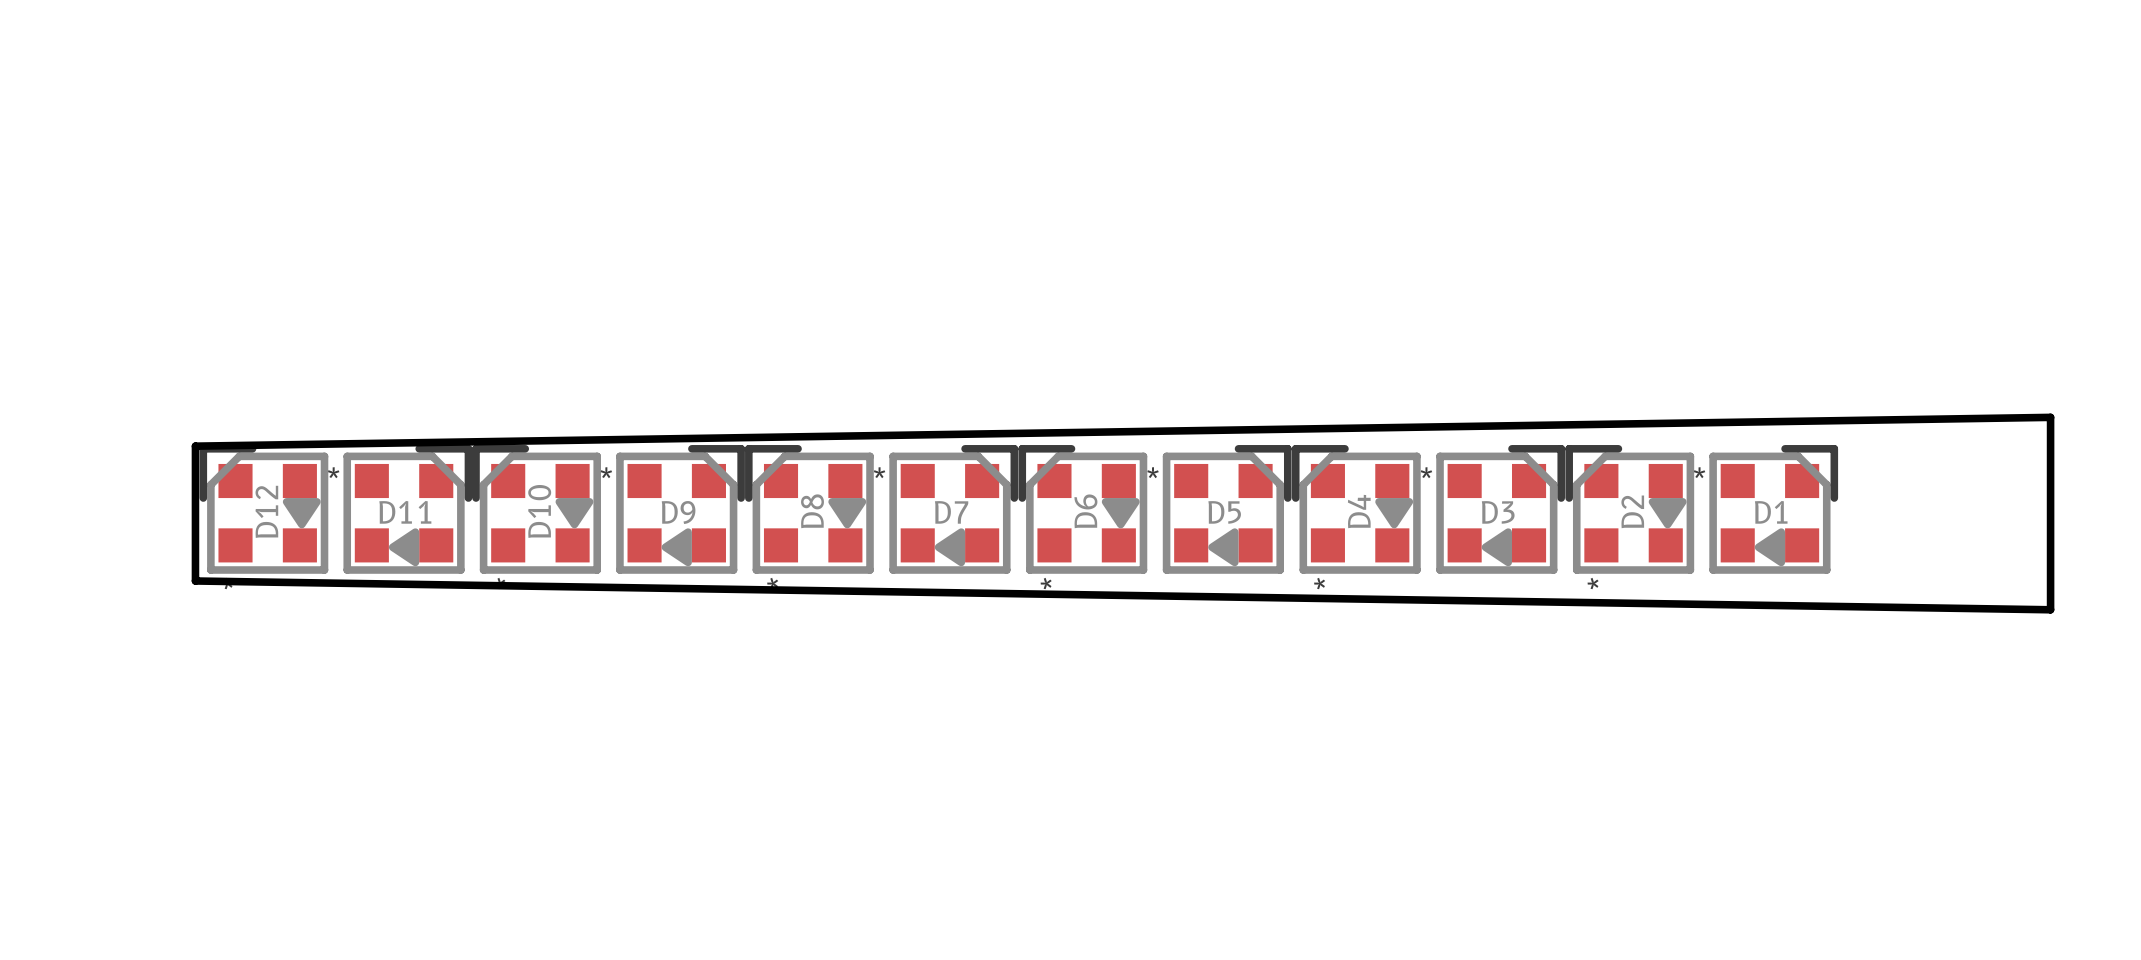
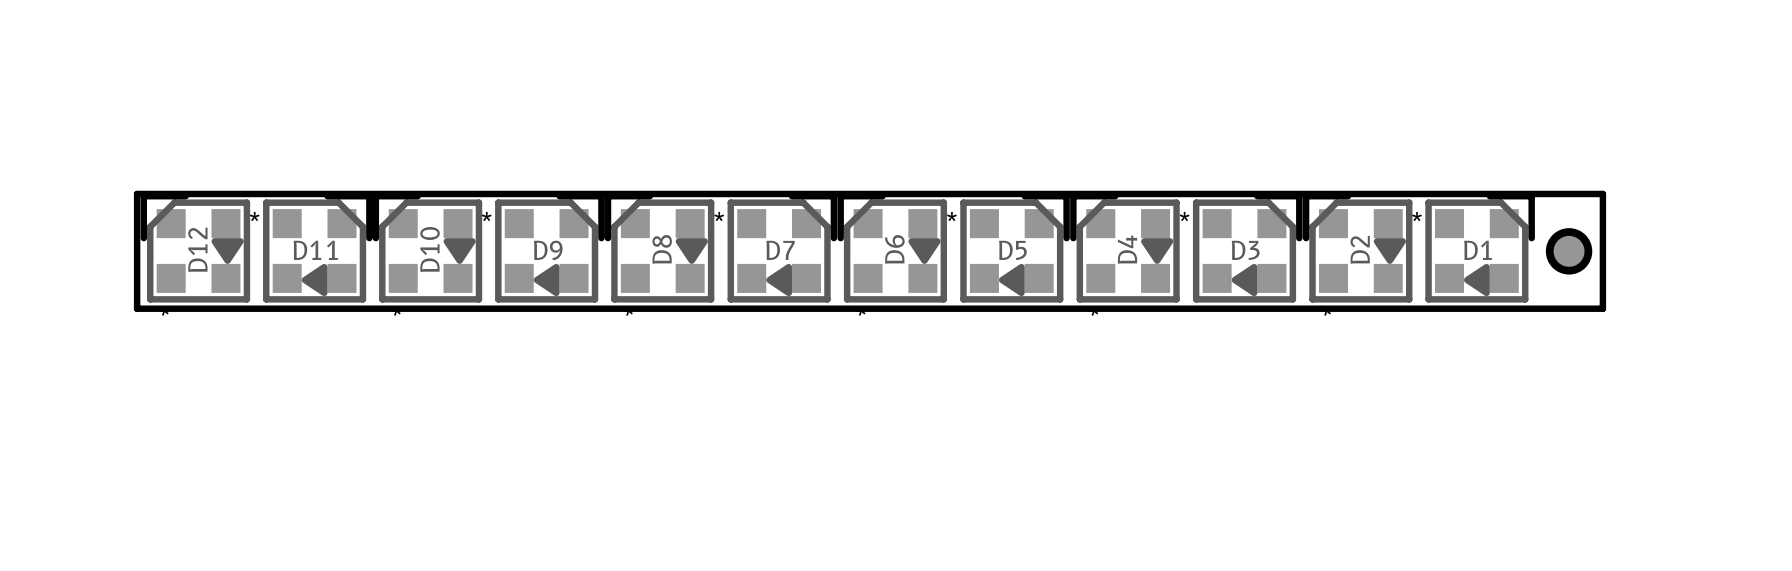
board edge: (195, 446) (2050, 417) (2050, 609) (195, 580) -> (137, 193) (1602, 193) (1602, 308) (137, 308)
part: none -> (1569, 251)

